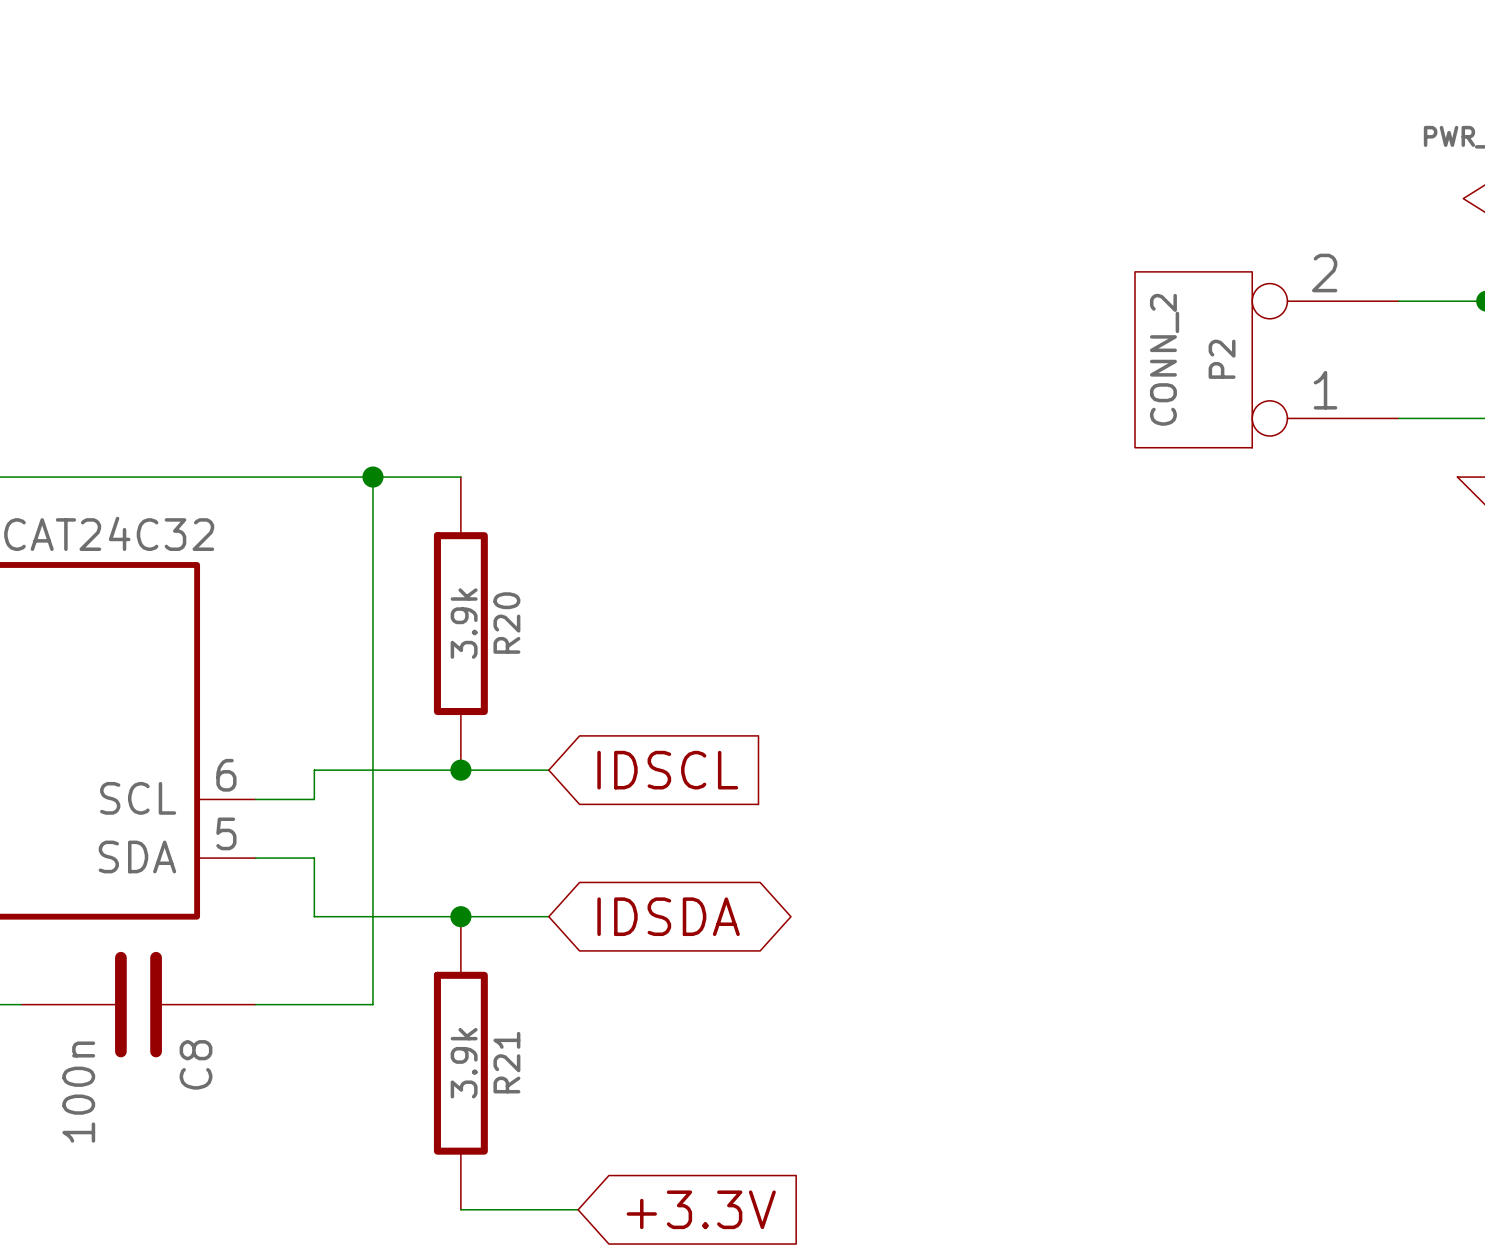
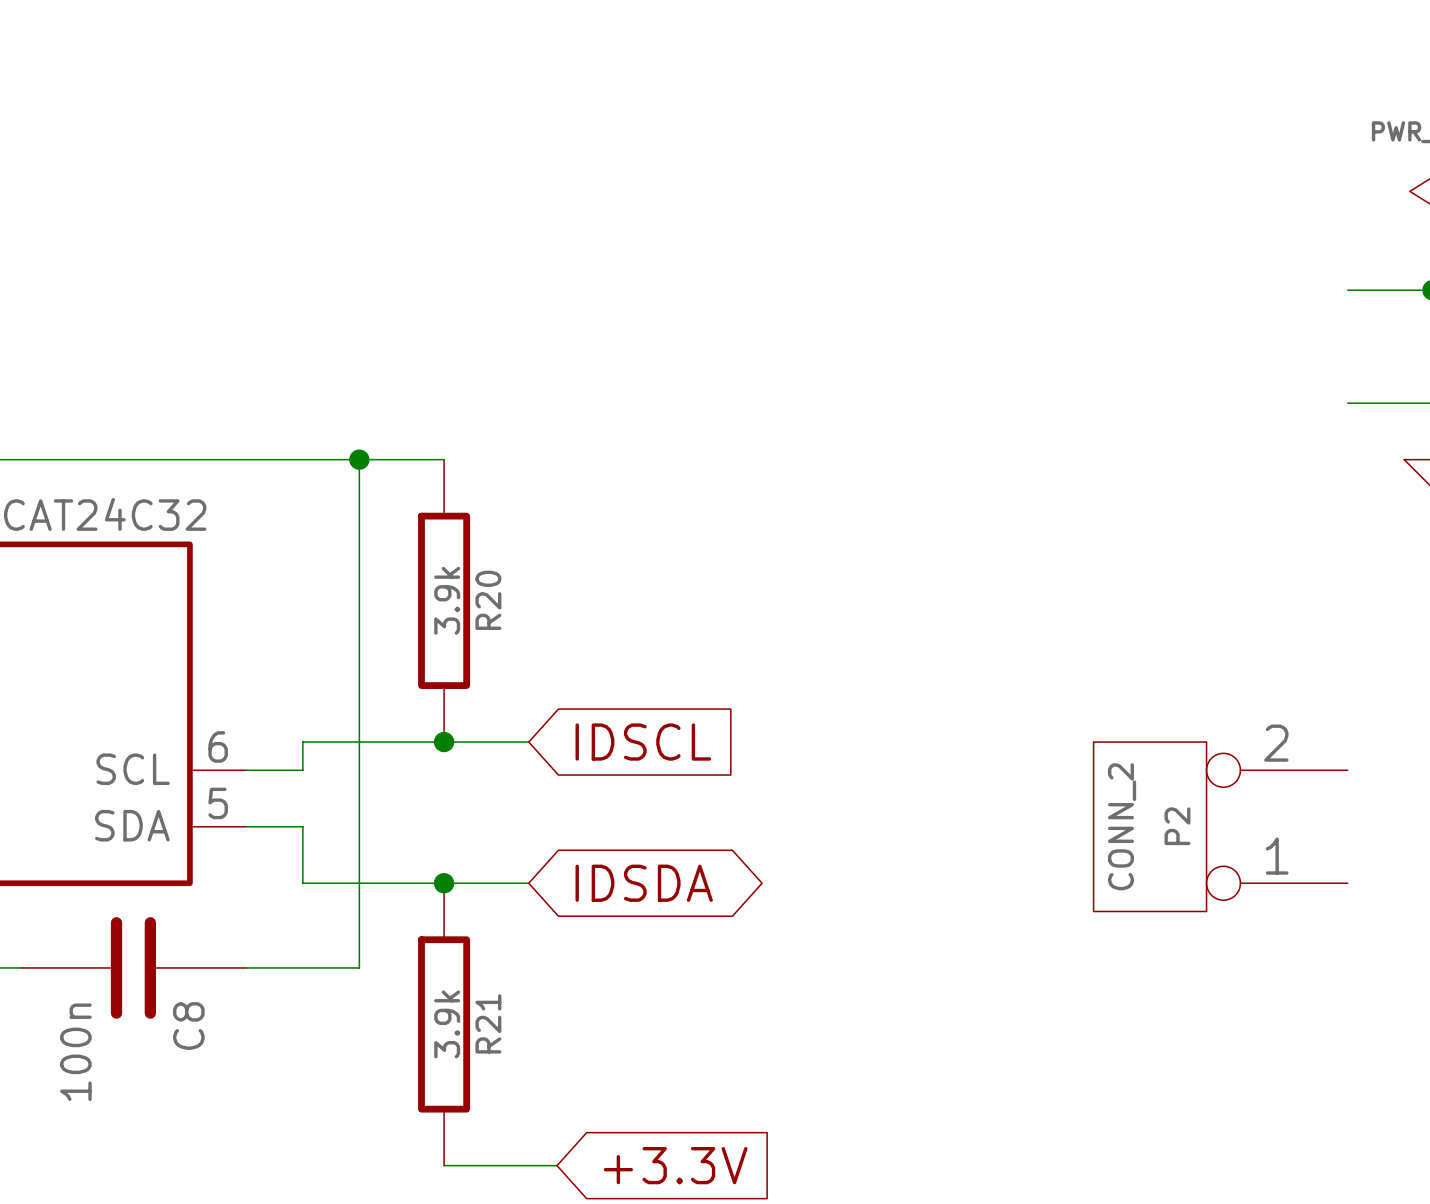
P2 position: (1266, 359) -> (1220, 826)

